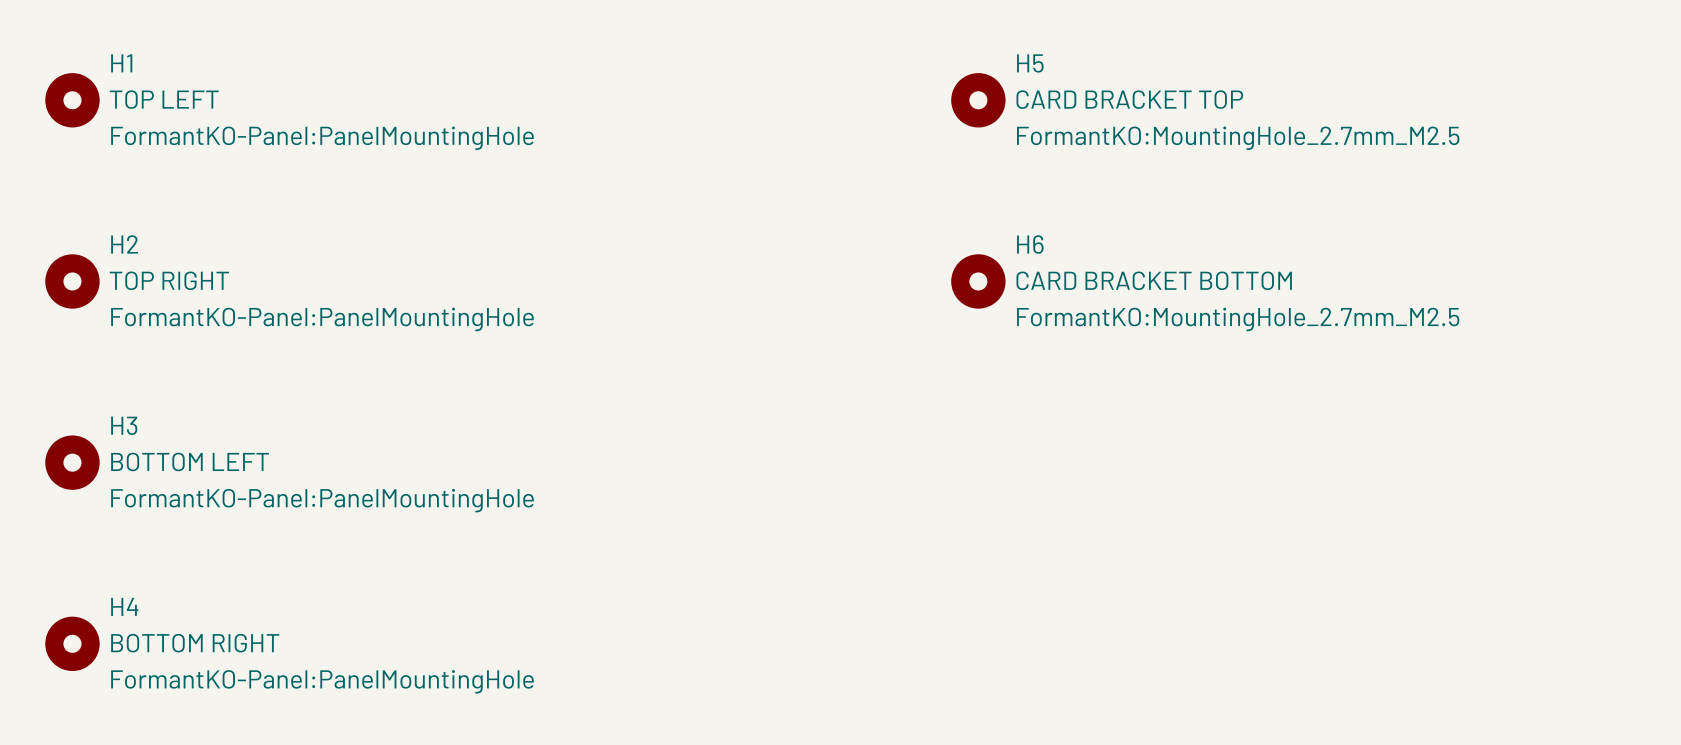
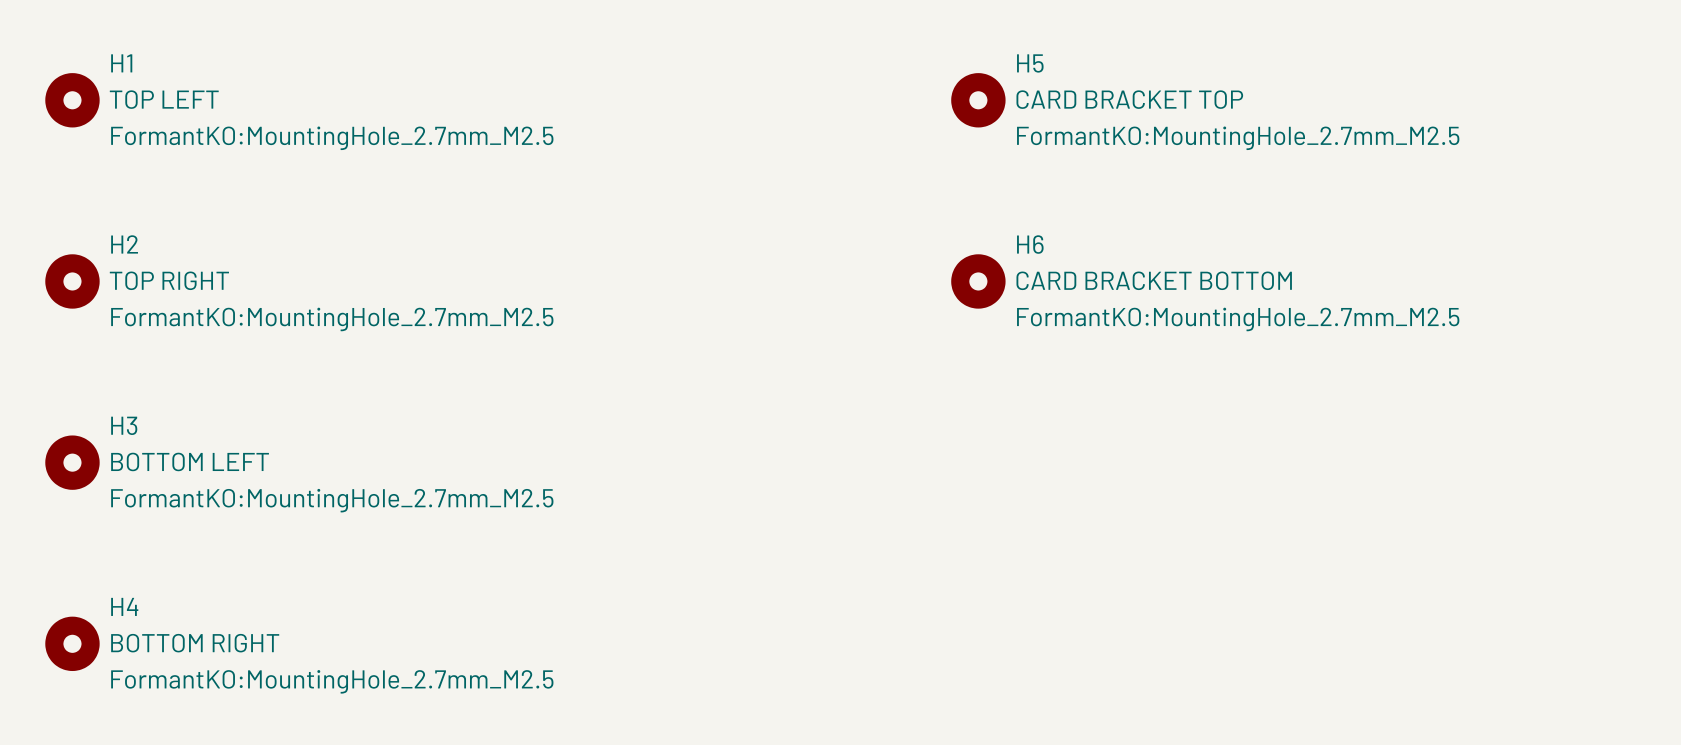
H1 text: FormantKO-Panel:PanelMountingHole (322, 138) -> FormantKO:MountingHole_2.7mm_M2.5 (332, 138)
H2 text: FormantKO-Panel:PanelMountingHole (322, 319) -> FormantKO:MountingHole_2.7mm_M2.5 (332, 319)
H3 text: FormantKO-Panel:PanelMountingHole (322, 500) -> FormantKO:MountingHole_2.7mm_M2.5 (332, 500)
H4 text: FormantKO-Panel:PanelMountingHole (322, 681) -> FormantKO:MountingHole_2.7mm_M2.5 (332, 681)

